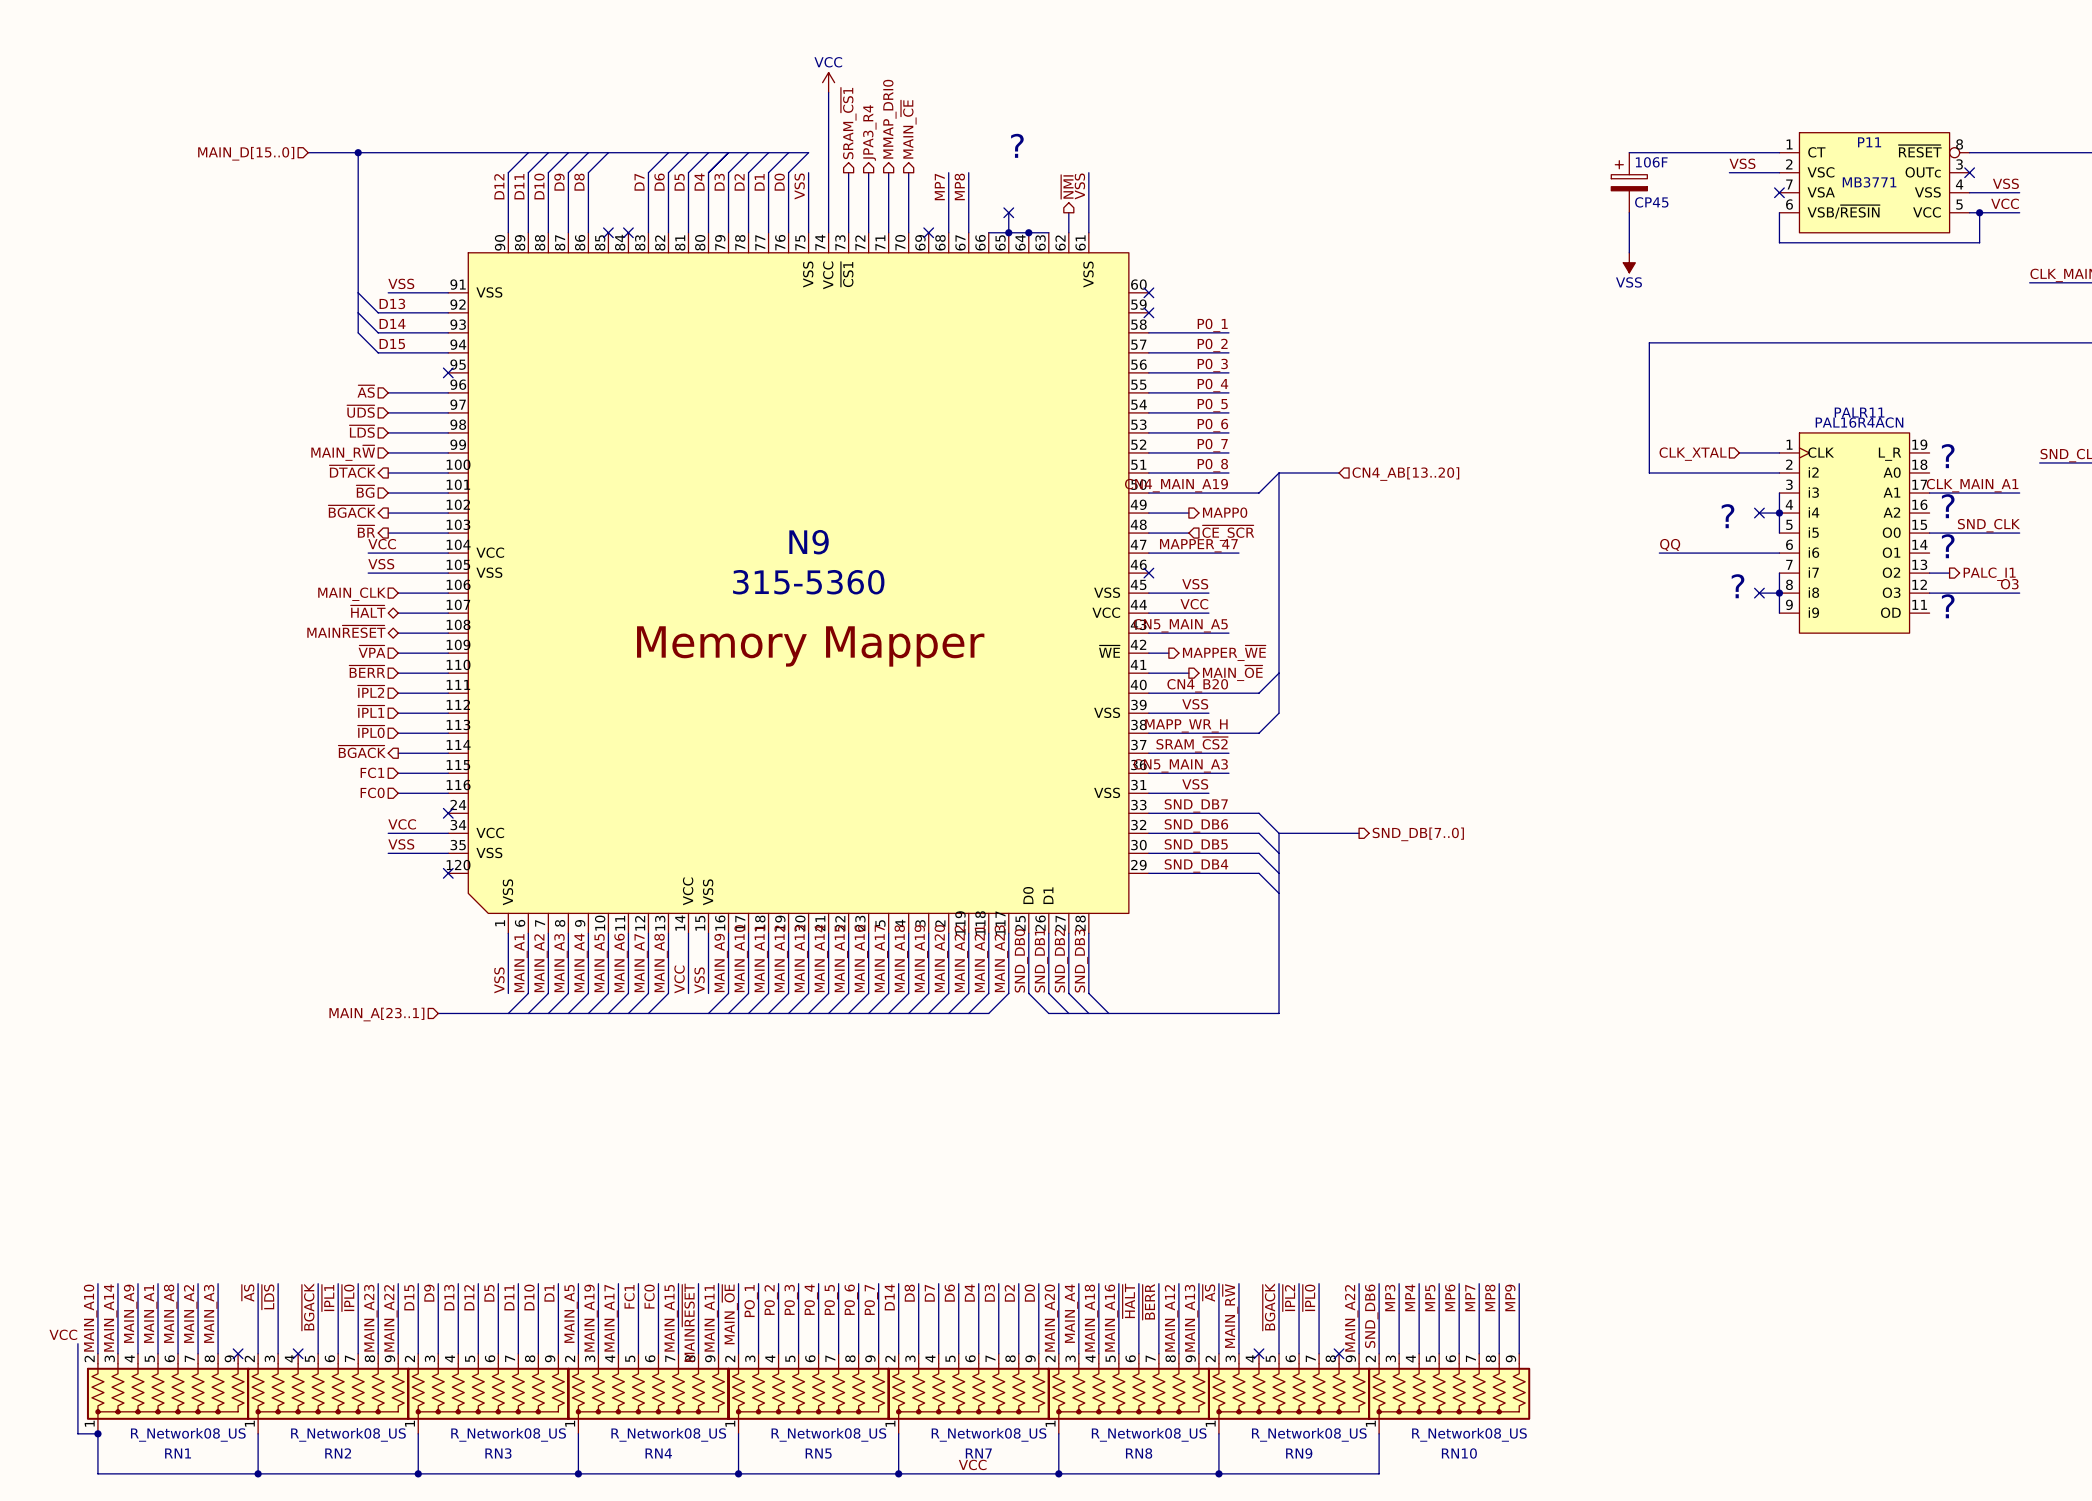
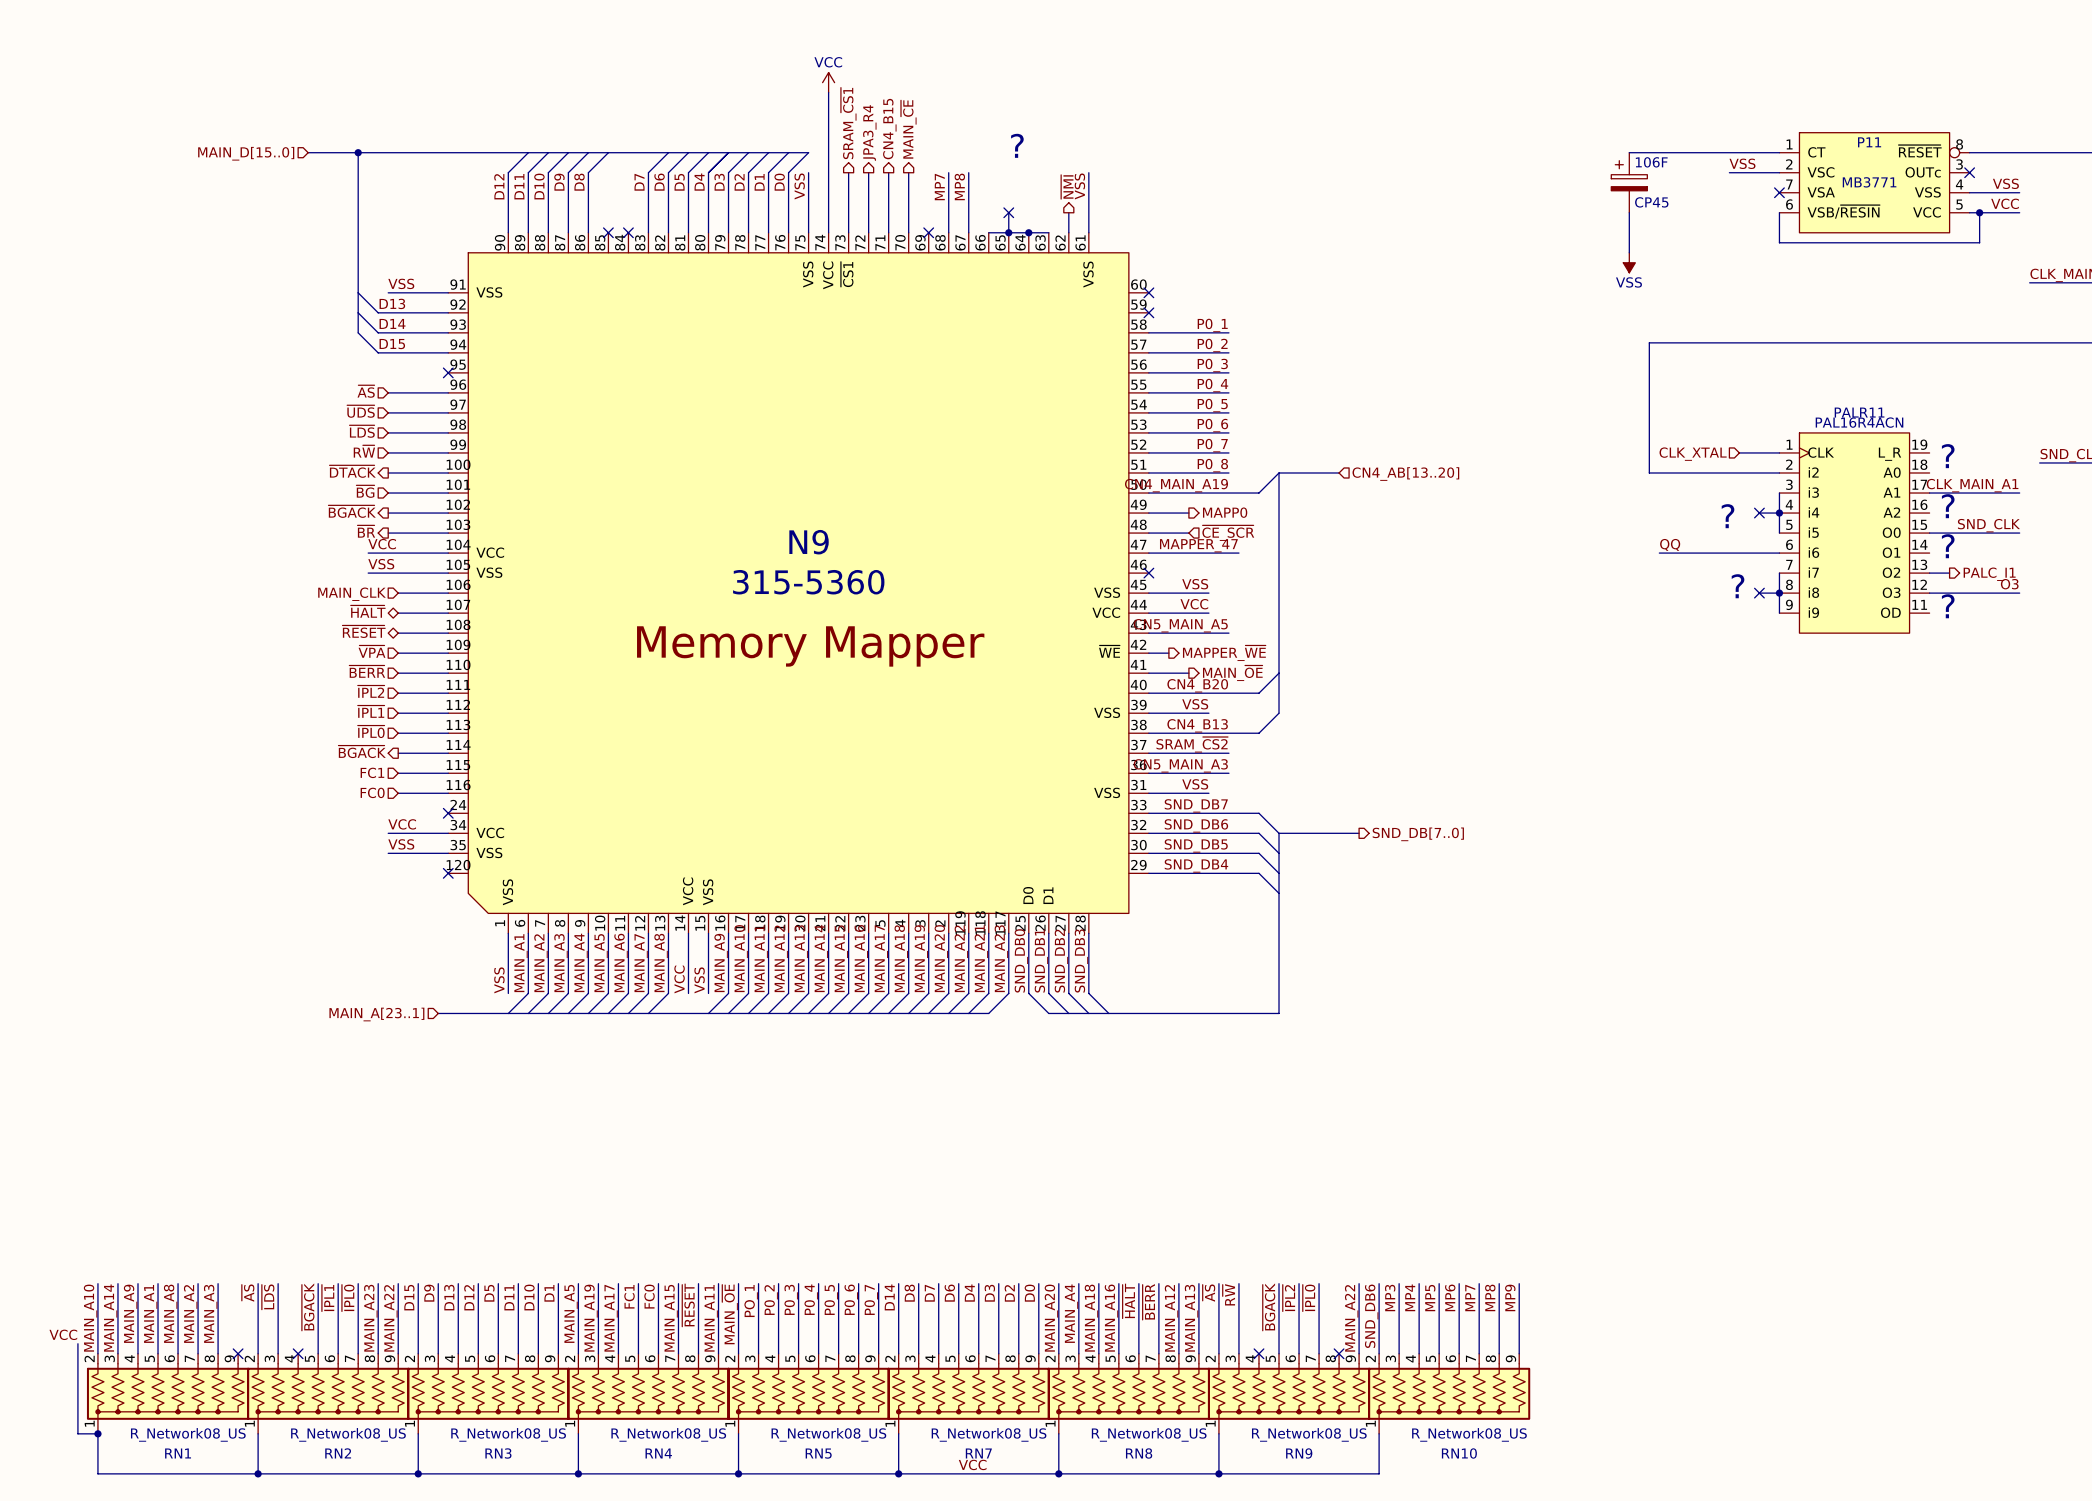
hierarchical label: MMAP_DRI0 (889, 119) -> CN4_B15 (889, 129)
hierarchical label: MAIN_R~{W} (343, 453) -> R~{W} (364, 451)
hierarchical label: MAIN~{RESET} (346, 631) -> ~{RESET} (364, 631)
label: MAPP_WR_H (1186, 725) -> CN4_B13 (1197, 725)
label: MAIN_R~{W} (1230, 1316) -> R~{W} (1228, 1294)
label: MAIN~{RESET} (688, 1322) -> ~{RESET} (688, 1305)

